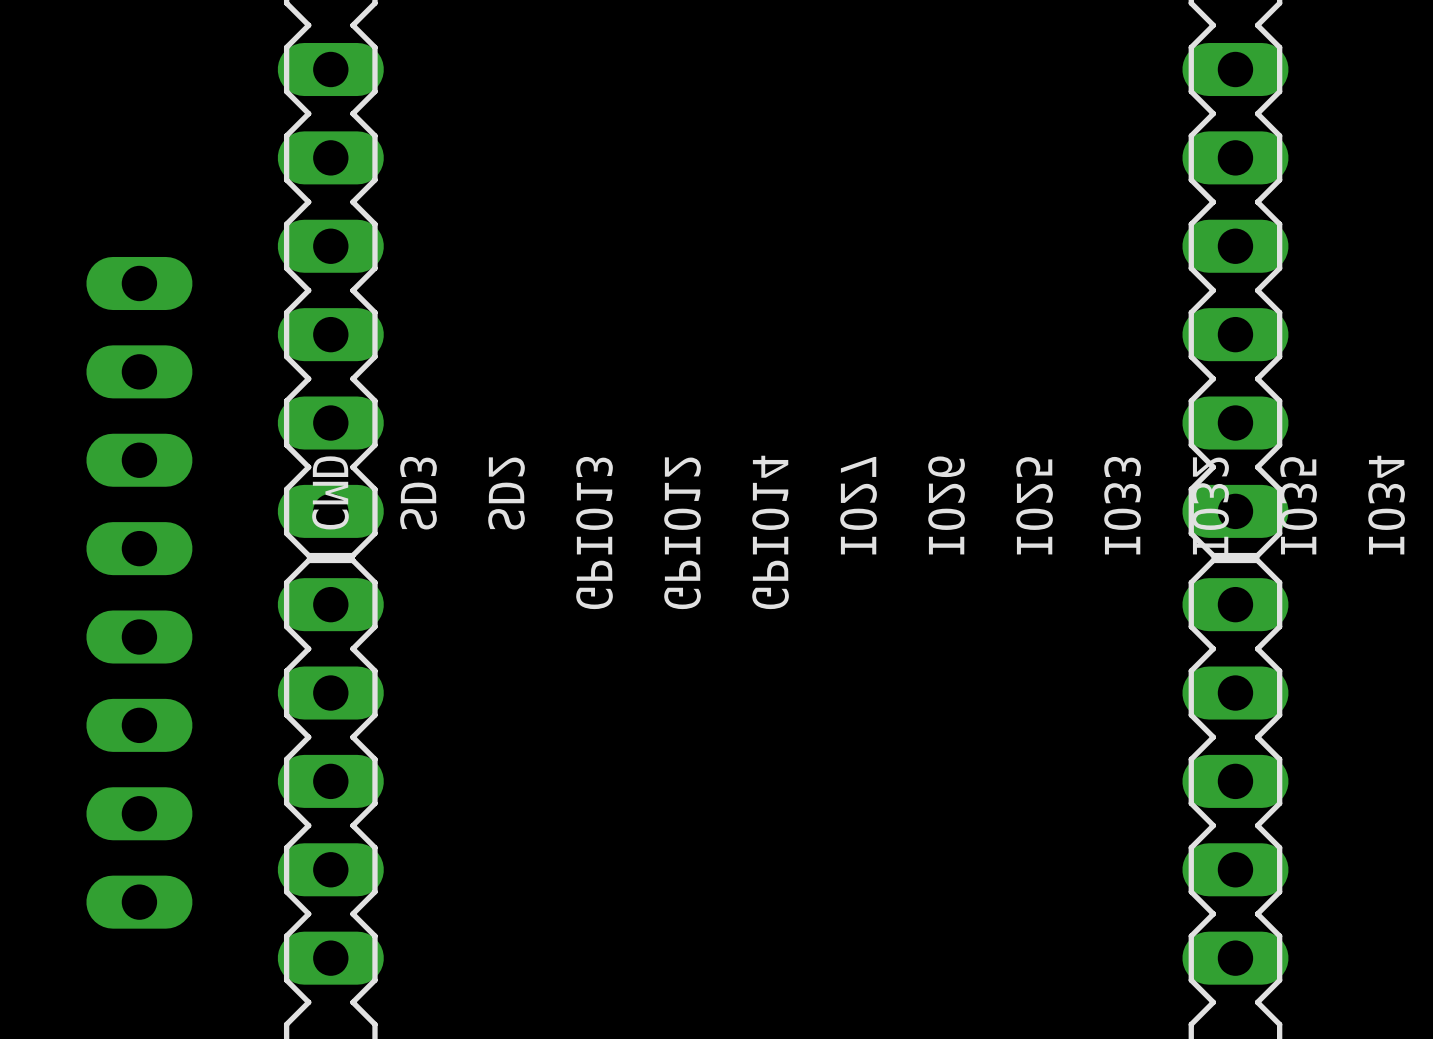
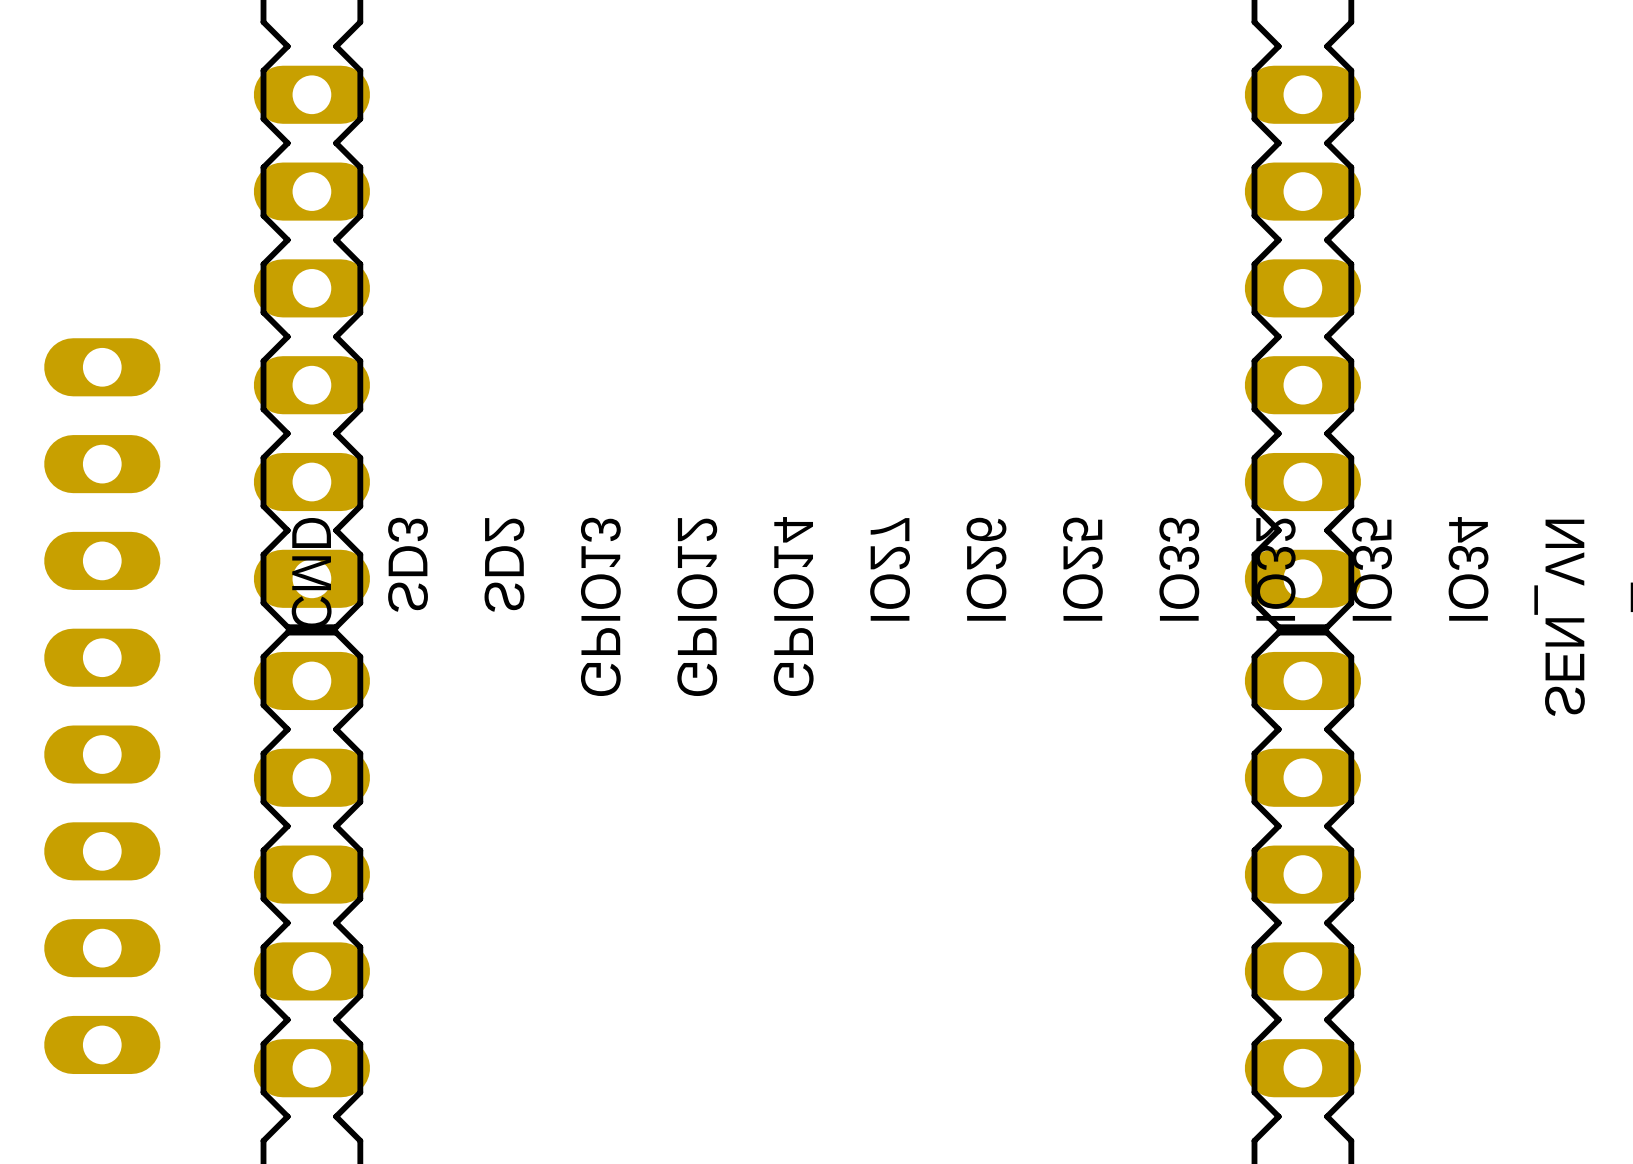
part position: (139, 592) -> (102, 706)

